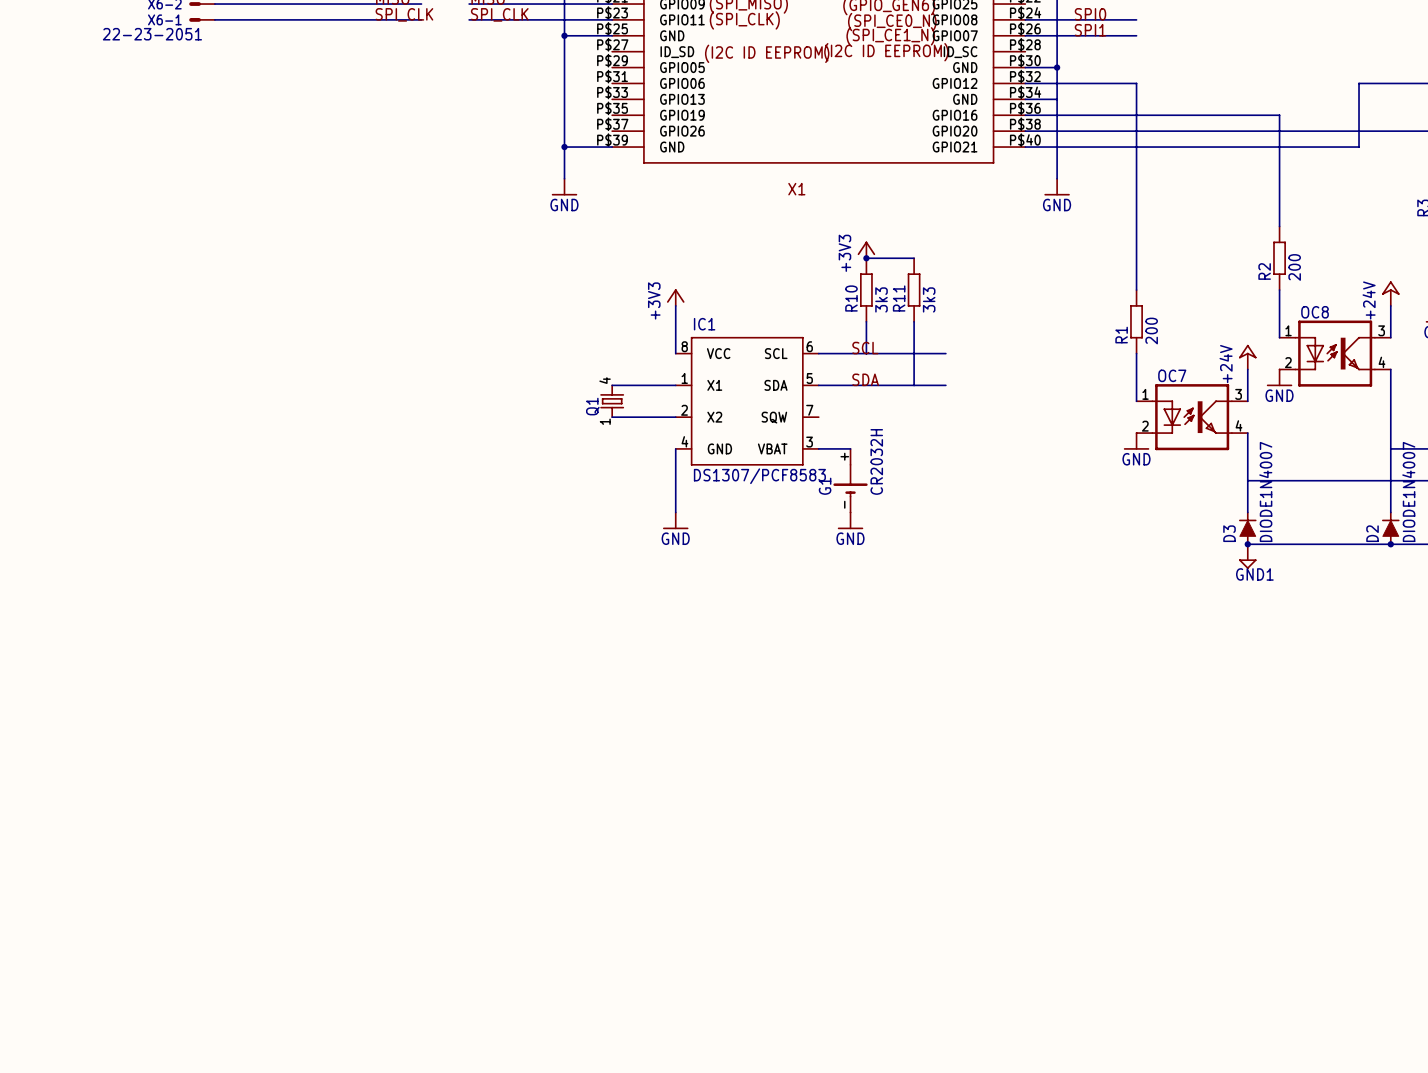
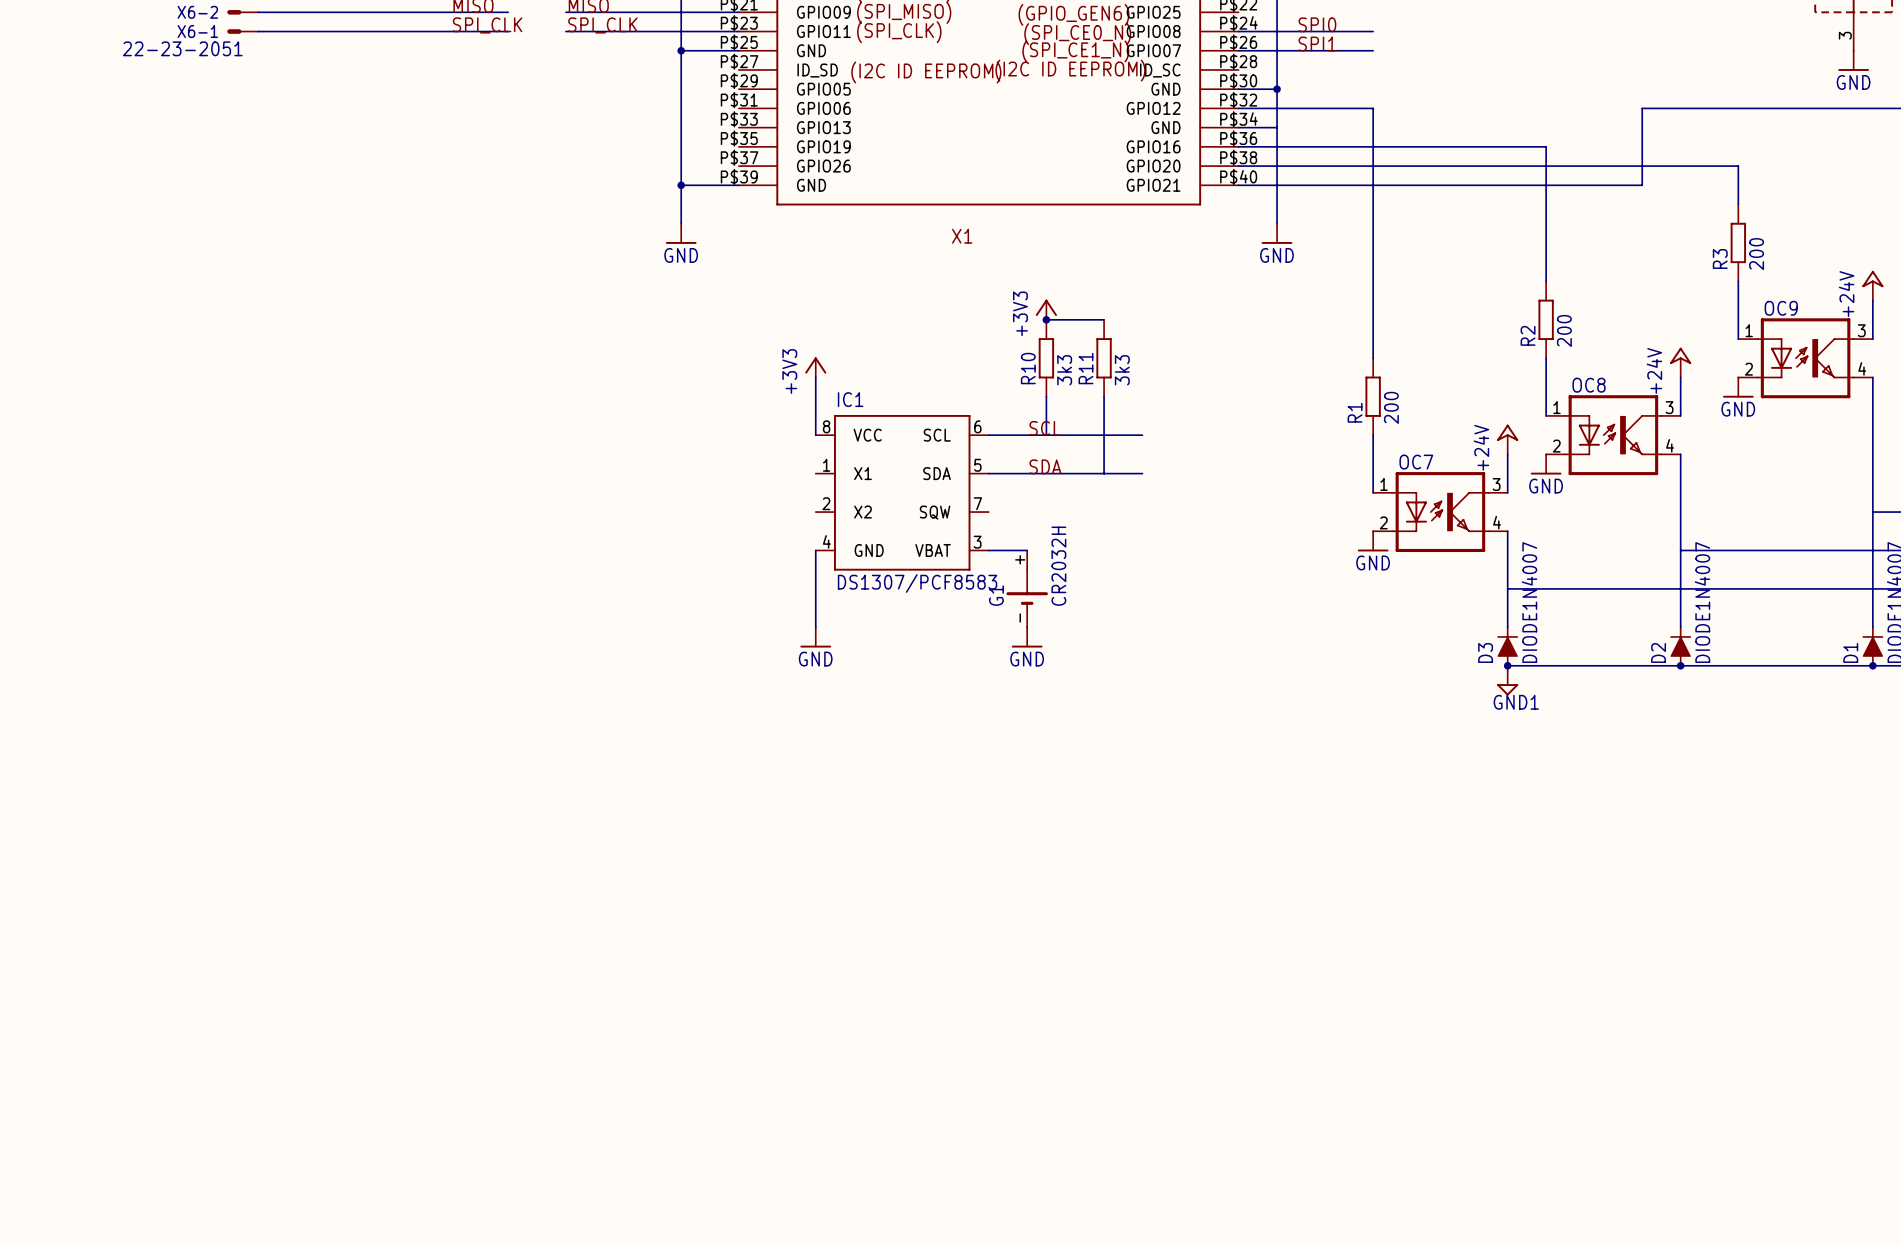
wire: (612, 385) (675, 385) -> none
Q1: (612, 401) -> none
wire: (612, 417) (675, 417) -> none

